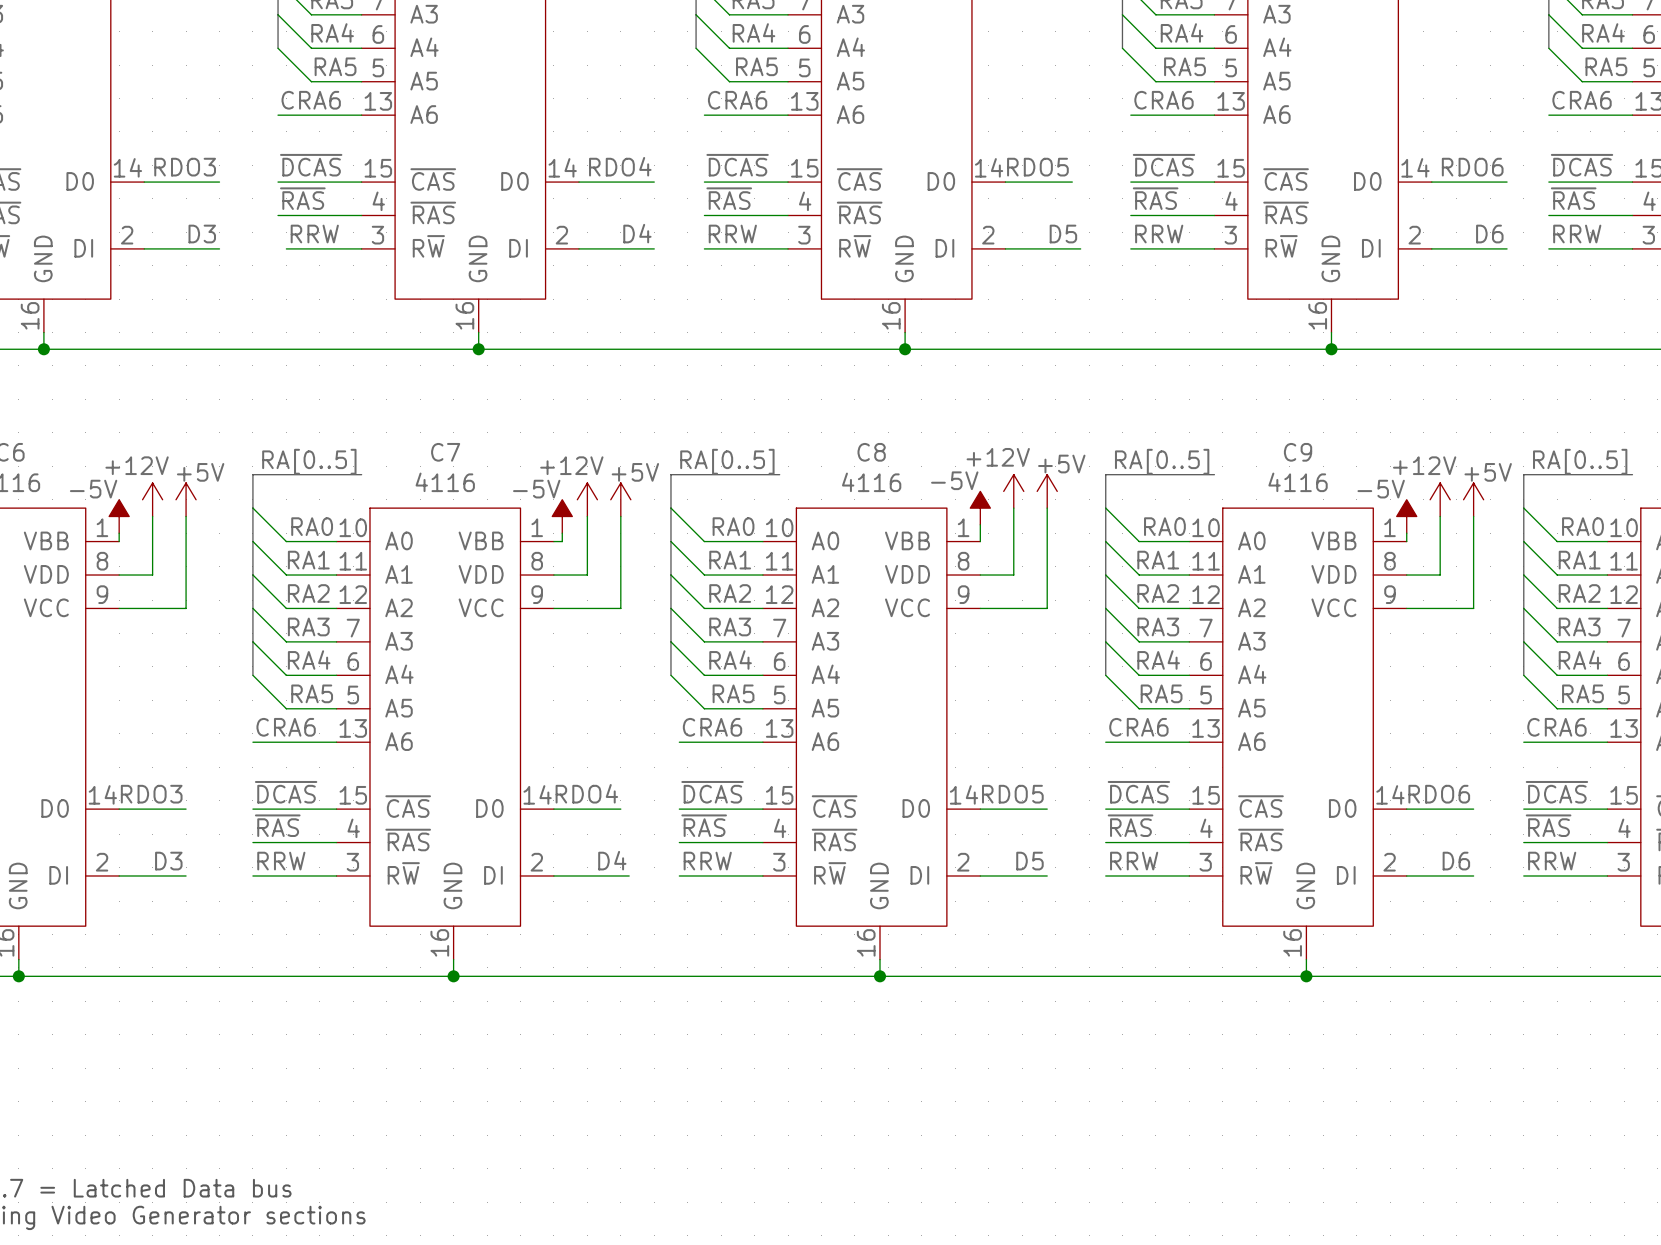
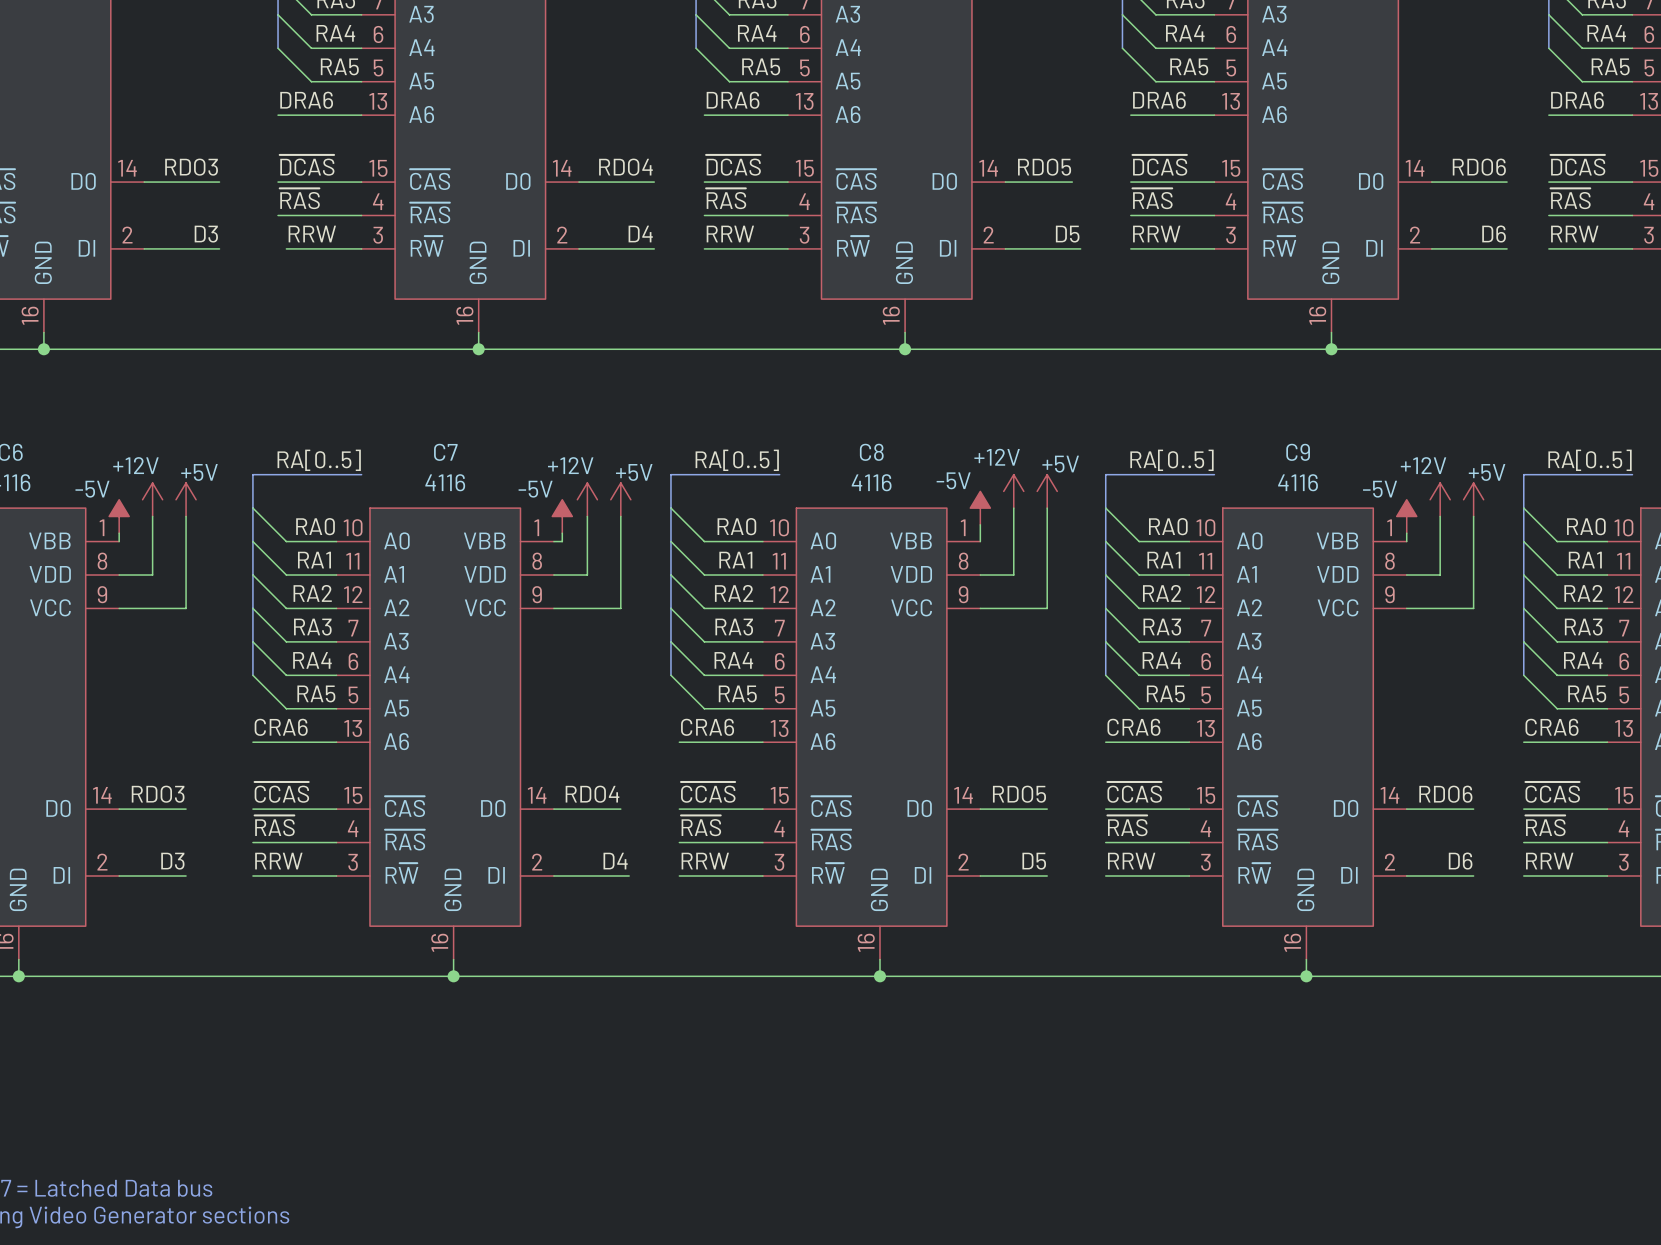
label: CRA6 (311, 100) -> DRA6 (306, 100)
label: CRA6 (737, 100) -> DRA6 (733, 100)
label: CRA6 (1163, 100) -> DRA6 (1159, 100)
label: CRA6 (1582, 100) -> DRA6 (1577, 100)
label: ~{DCAS} (286, 792) -> ~{CCAS} (281, 792)
label: ~{DCAS} (712, 792) -> ~{CCAS} (708, 792)
label: ~{DCAS} (1138, 792) -> ~{CCAS} (1134, 792)
label: ~{DCAS} (1556, 792) -> ~{CCAS} (1552, 792)

